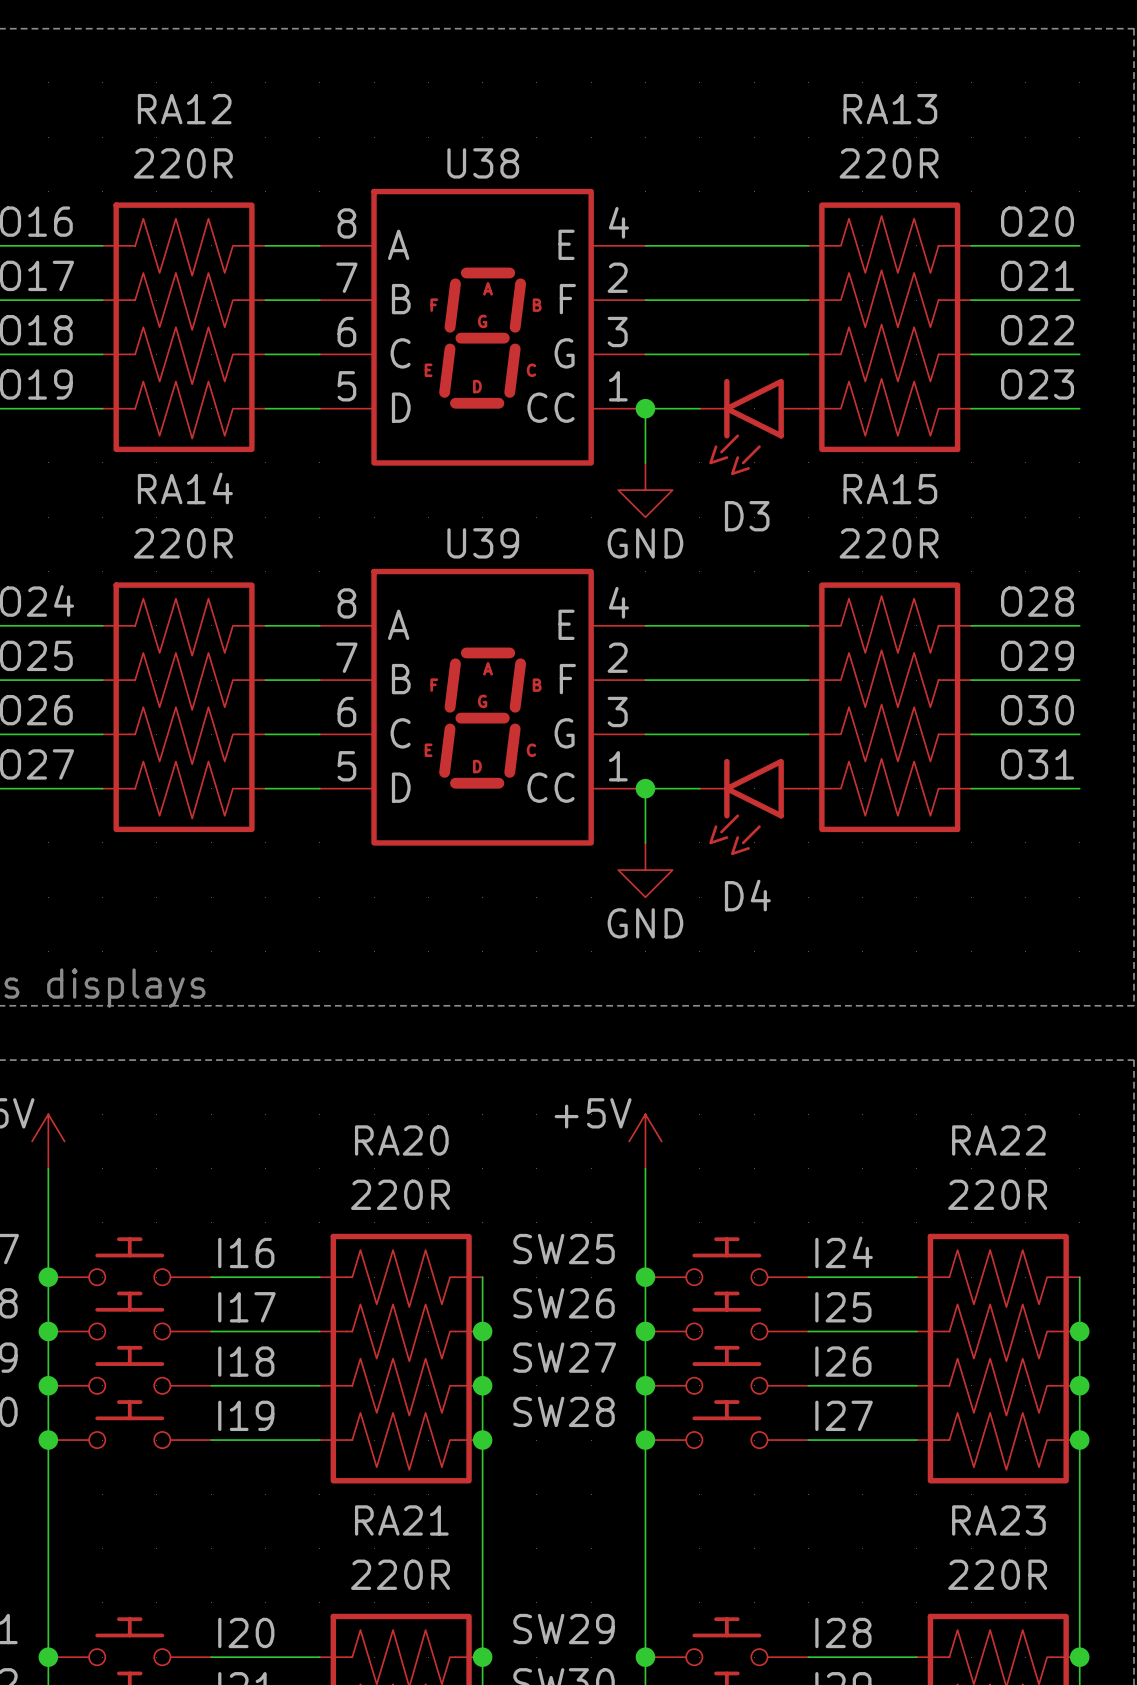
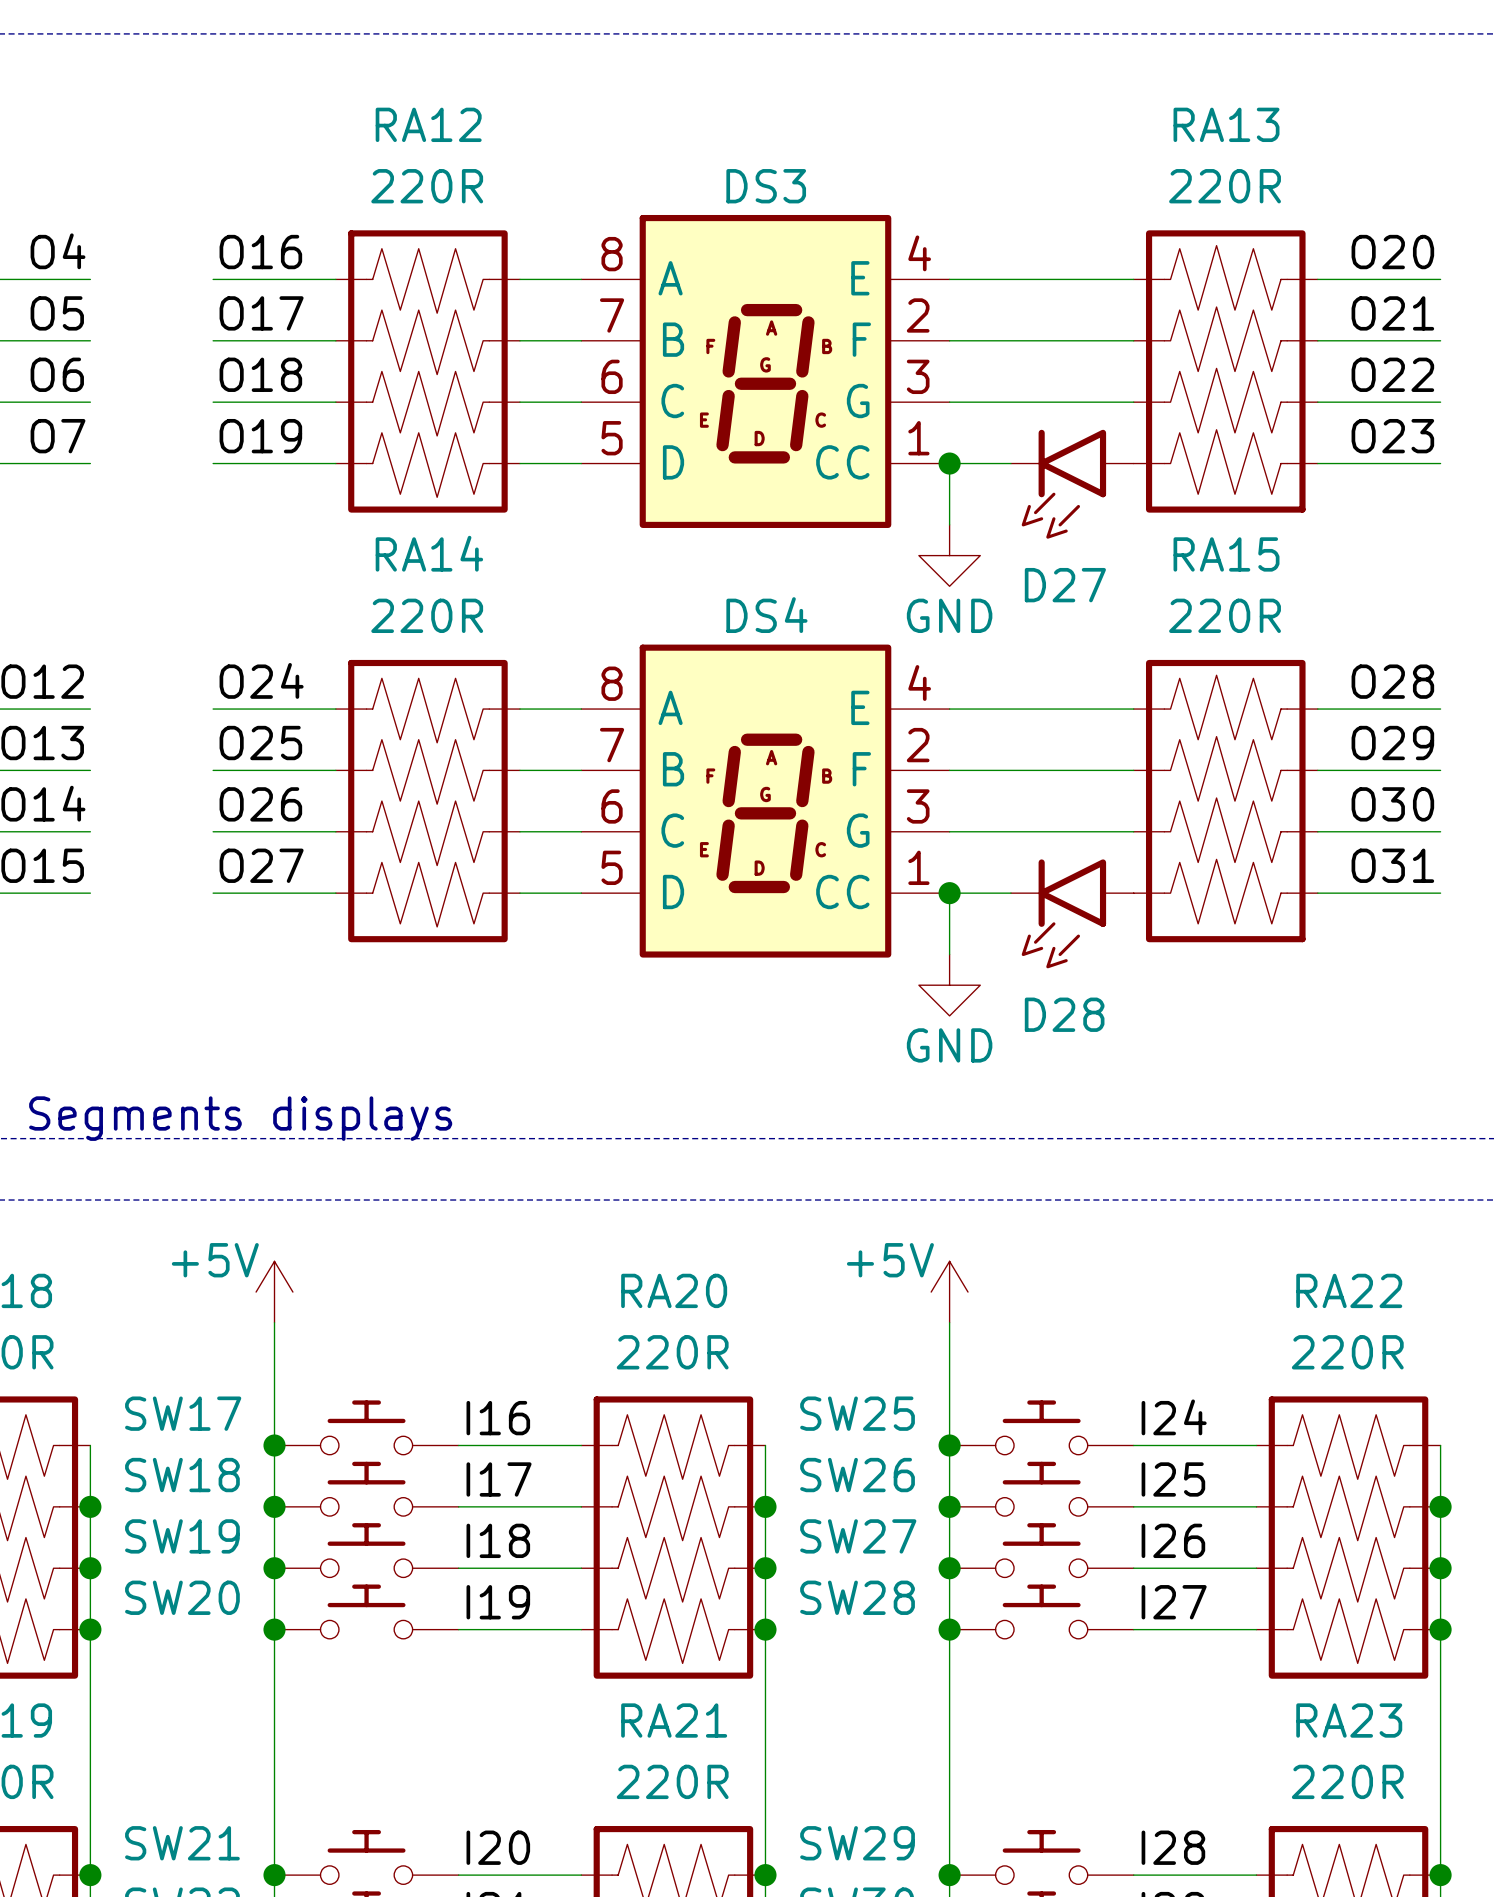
U38 name: U38 (483, 163) -> DS3 (766, 186)
D3 name: D3 (747, 516) -> D27 (1065, 585)
U39 name: U39 (483, 543) -> DS4 (766, 615)
D4 name: D4 (747, 895) -> D28 (1064, 1014)

